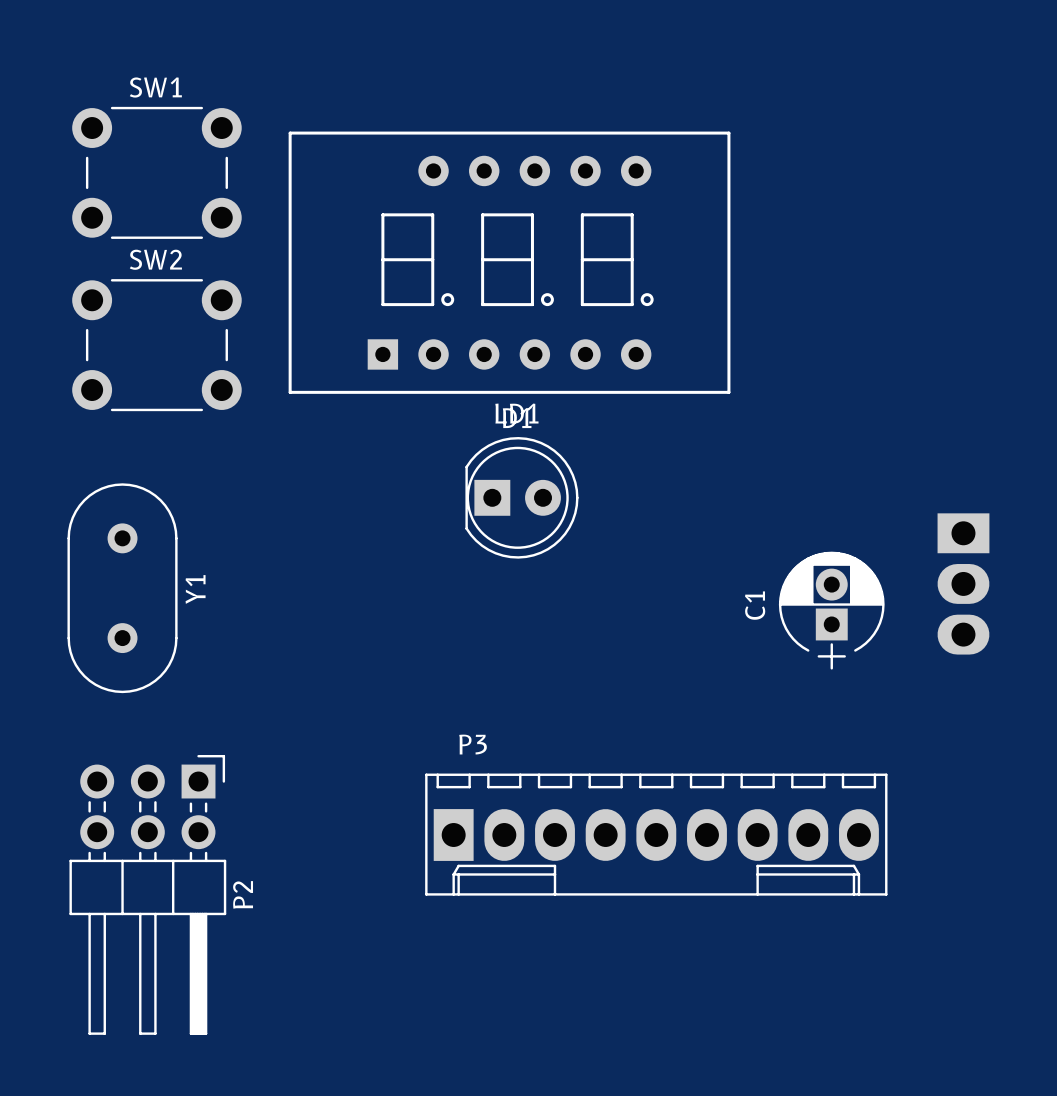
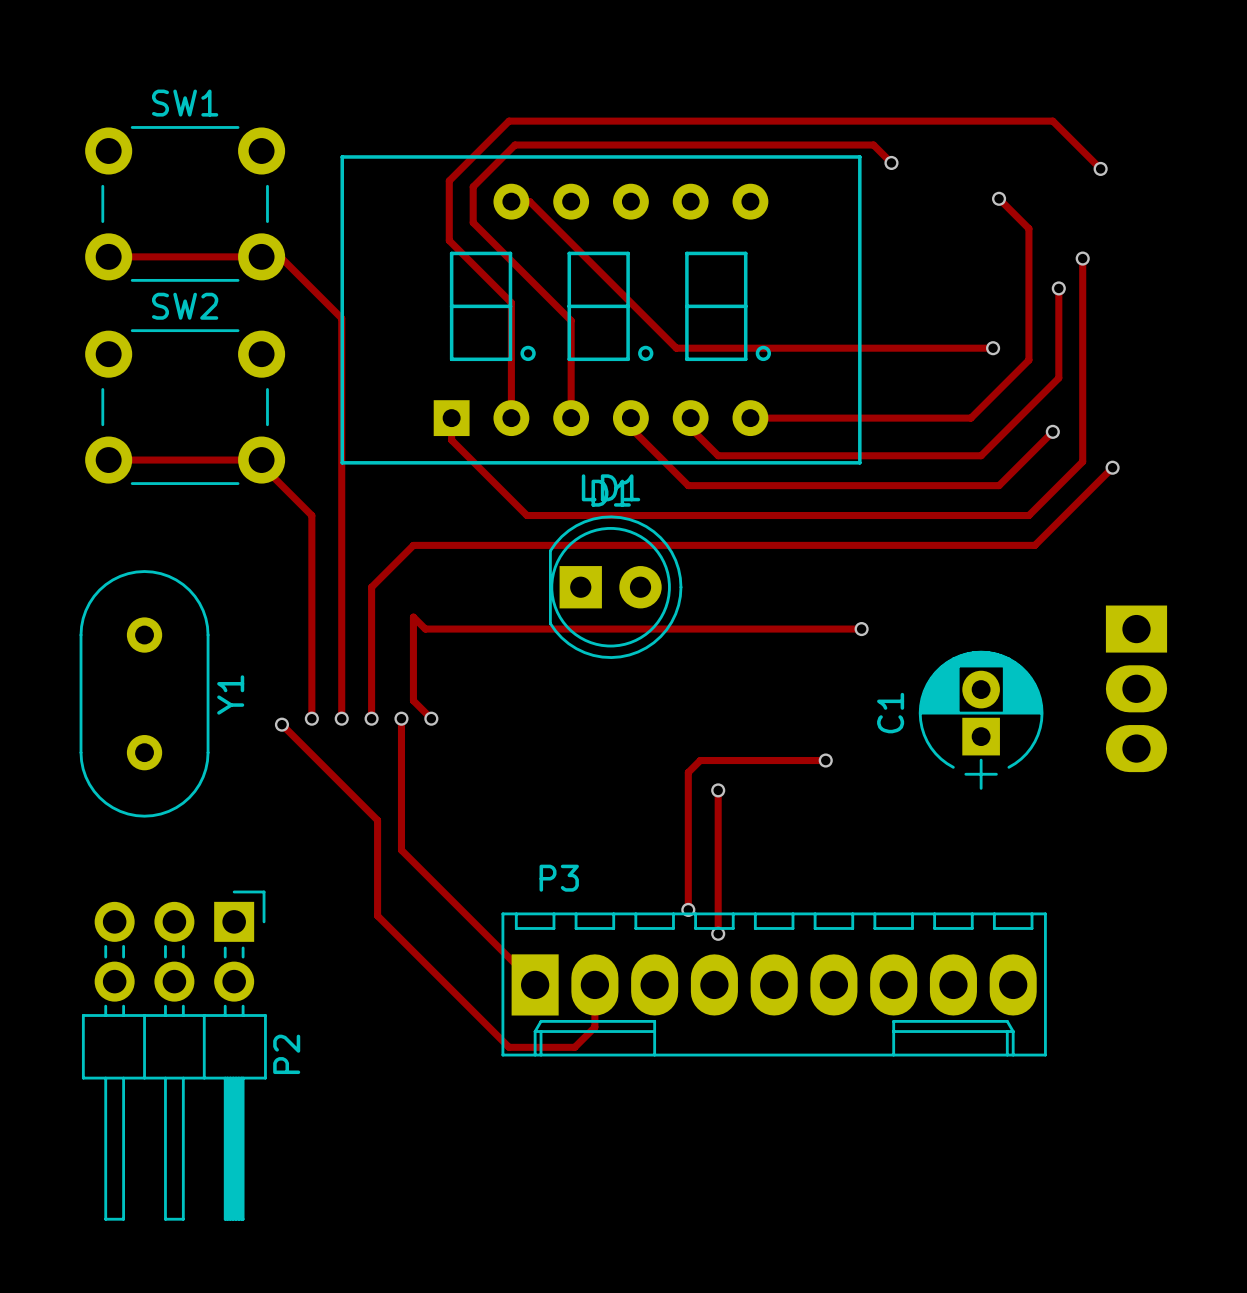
track: none -> (891, 162) (873, 145) (515, 145) (473, 186) (473, 222) (571, 320) (571, 418)
via: none -> (891, 162)
track: none -> (1100, 168) (1052, 121) (509, 121) (449, 180) (449, 240) (511, 302) (511, 418)
via: none -> (1100, 168)
track: none -> (999, 198) (1028, 228) (1028, 360) (970, 418) (750, 418)
via: none -> (999, 198)
track: none -> (511, 201) (529, 201) (676, 348) (993, 348)
track: none -> (108, 256) (280, 256) (341, 318) (341, 718)
track: none -> (1082, 258) (1082, 461) (1028, 515) (526, 515) (451, 440) (451, 418)
via: none -> (1082, 258)
track: none -> (1058, 288) (1058, 378) (981, 455) (718, 455) (690, 428) (690, 418)
via: none -> (1058, 288)
via: none -> (993, 348)
track: none -> (630, 418) (630, 428) (688, 485) (999, 485) (1052, 431)
via: none -> (1052, 431)
track: none -> (108, 460) (261, 460) (261, 465) (311, 515) (311, 718)
track: none -> (1112, 467) (1034, 545) (413, 545) (371, 587) (371, 718)
via: none -> (1112, 467)
track: none -> (861, 629) (425, 629) (413, 617) (413, 700) (431, 718)
via: none -> (861, 629)
via: none -> (311, 718)
via: none -> (341, 718)
via: none -> (371, 718)
track: none -> (401, 718) (401, 850) (535, 984)
via: none -> (401, 718)
via: none -> (431, 718)
track: none -> (281, 724) (377, 820) (377, 915) (509, 1047) (574, 1047) (594, 1027) (594, 984)
via: none -> (281, 724)
track: none -> (825, 760) (700, 760) (688, 772) (688, 909)
via: none -> (825, 760)
track: none -> (718, 790) (718, 933)
via: none -> (718, 790)
via: none -> (688, 909)
via: none -> (718, 933)

